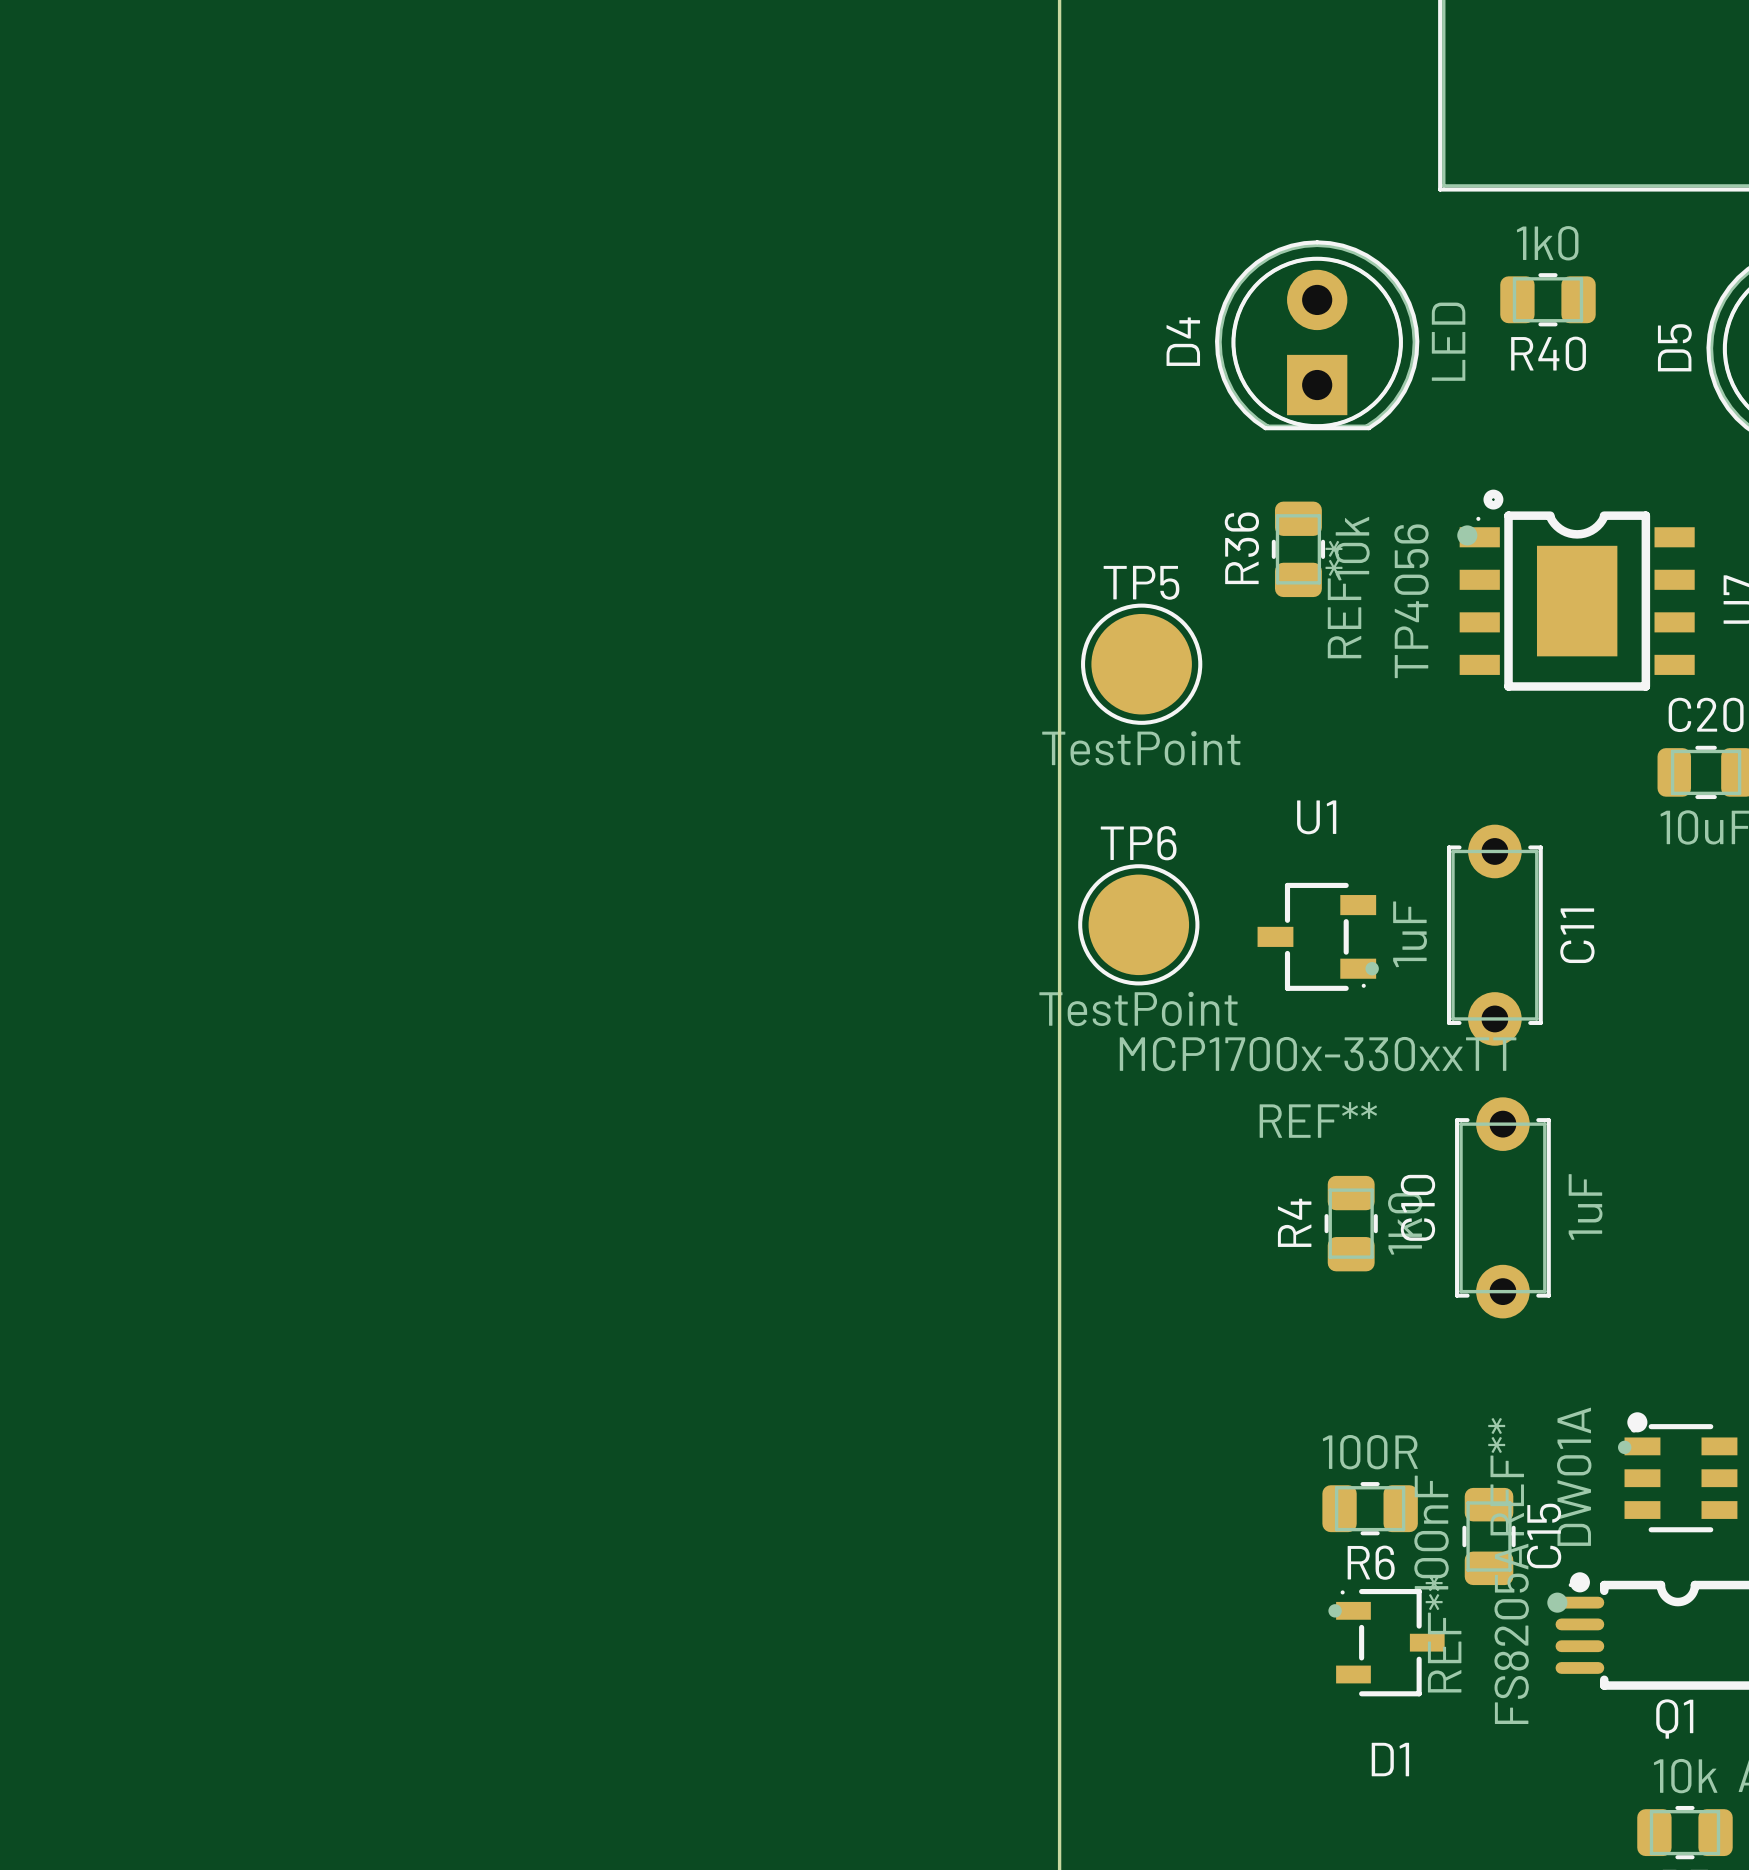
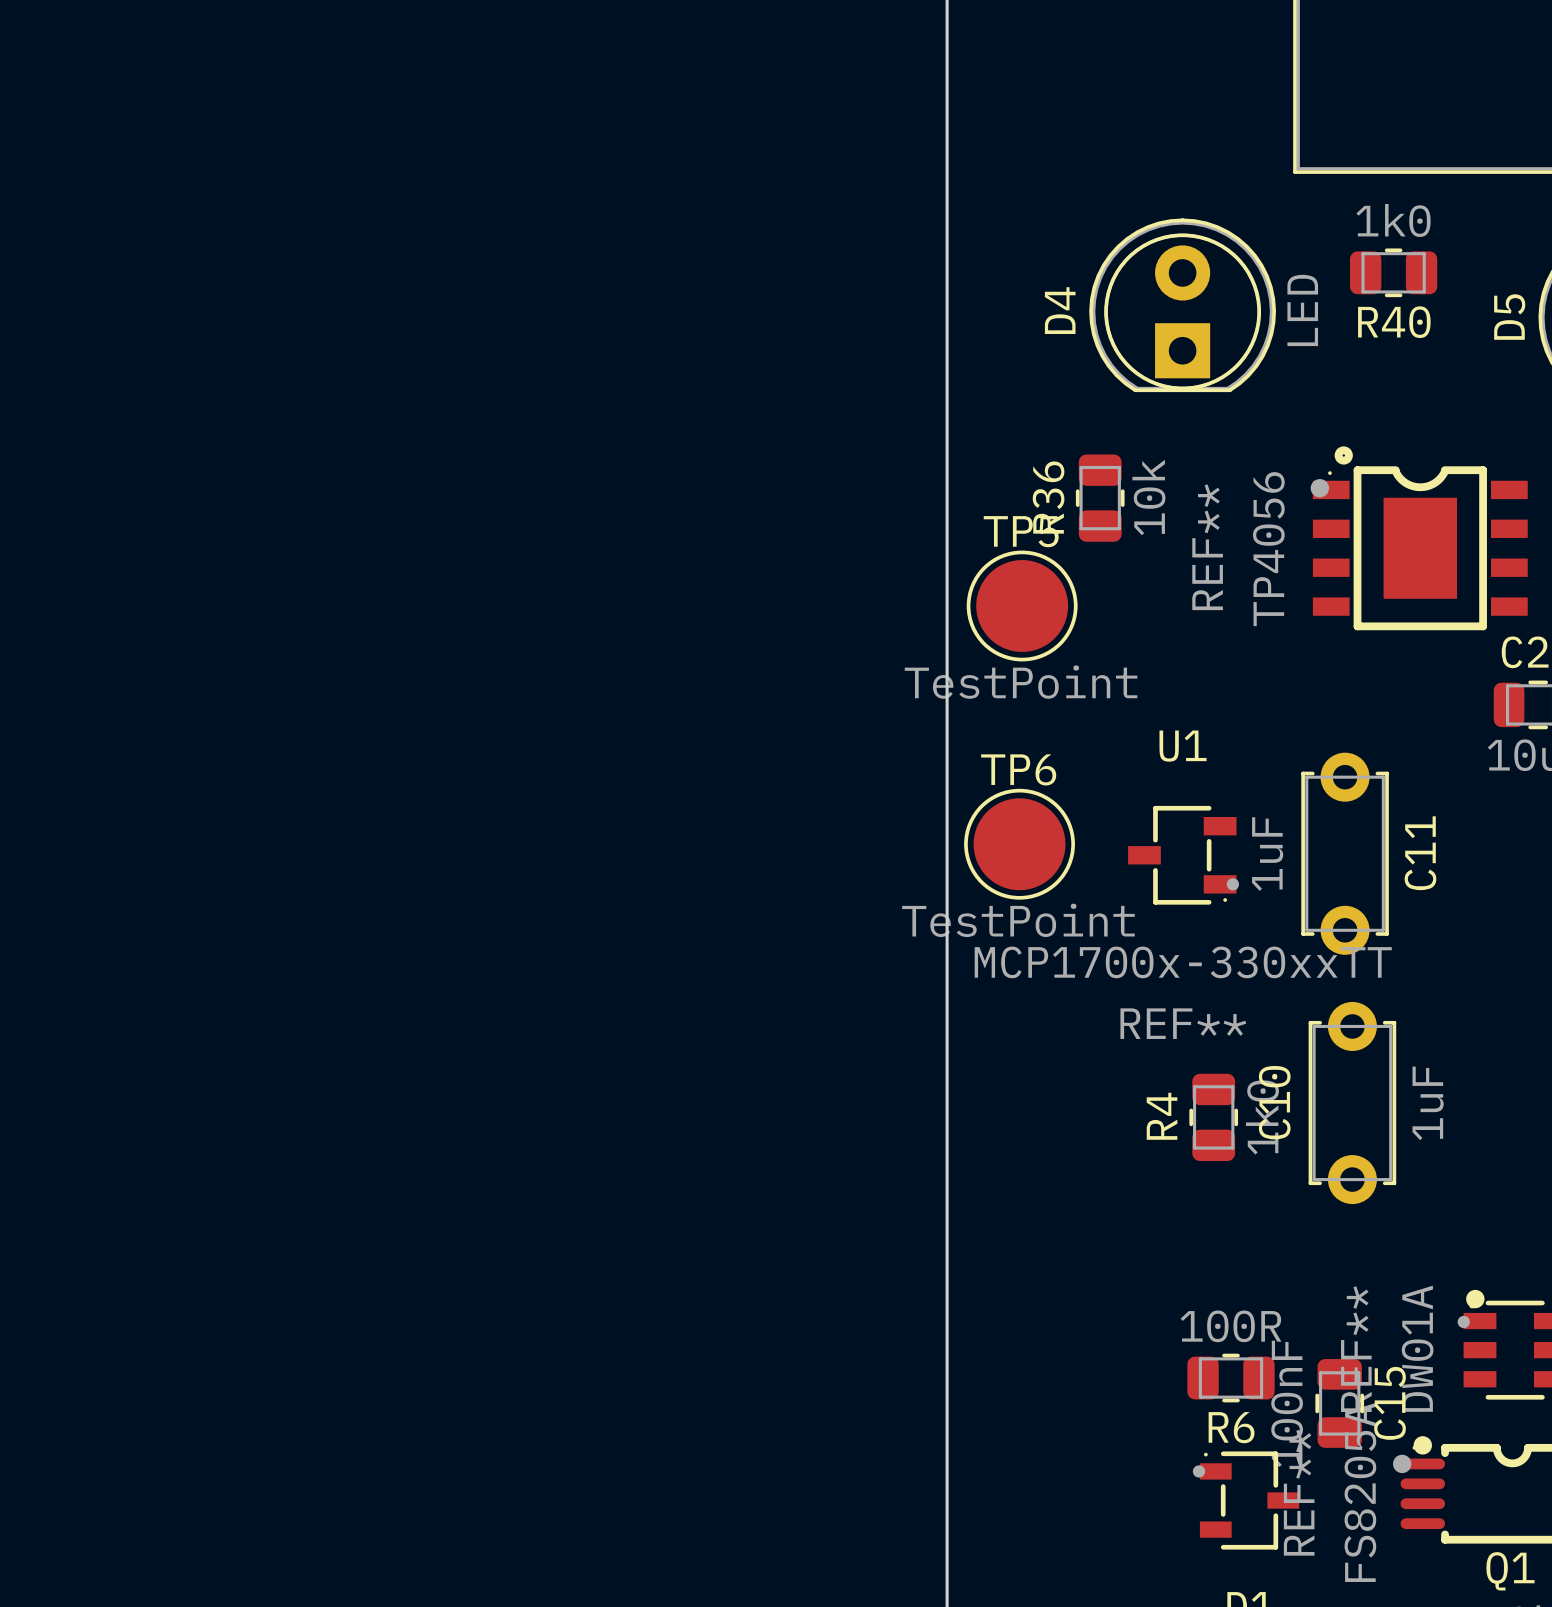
R36 position: (1298, 549) -> (1100, 498)

